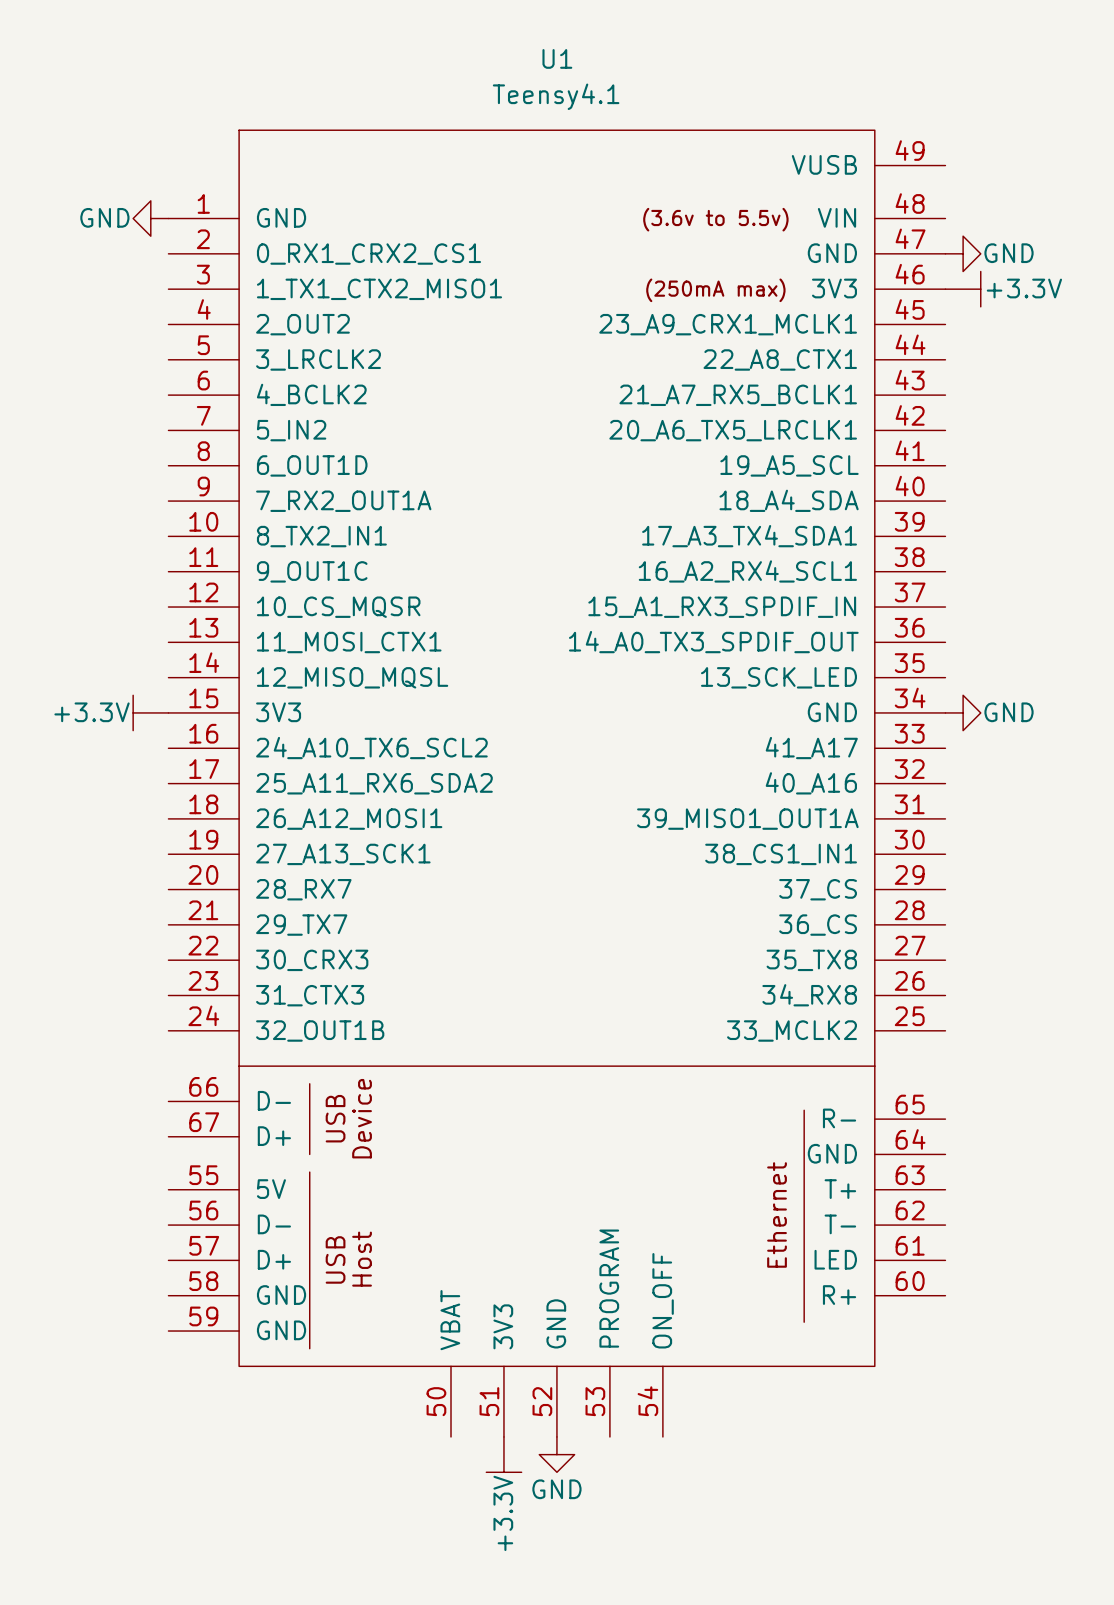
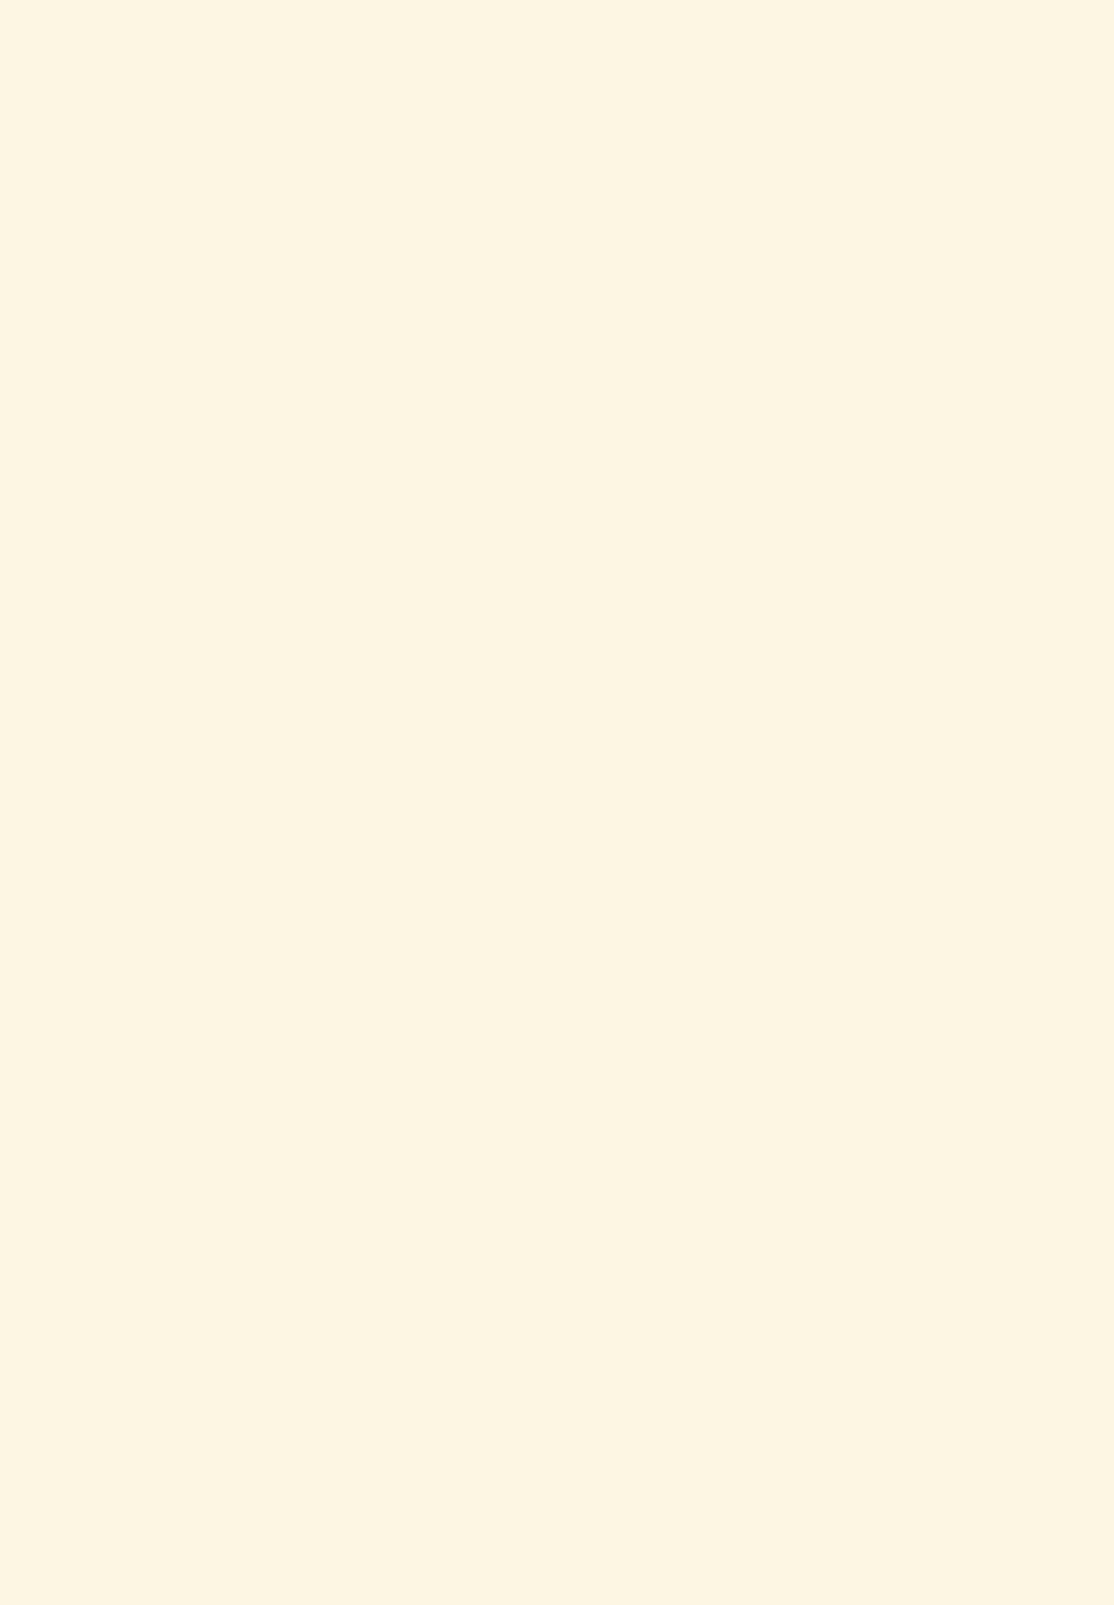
power symbol: GND (150, 218) -> none
power symbol: GND (963, 253) -> none
power symbol: +3.3V (963, 289) -> none
power symbol: +3.3V (150, 712) -> none
power symbol: GND (963, 712) -> none
U1: Teensy4.1 (556, 783) -> none
power symbol: +3.3V (503, 1454) -> none
power symbol: GND (556, 1454) -> none

